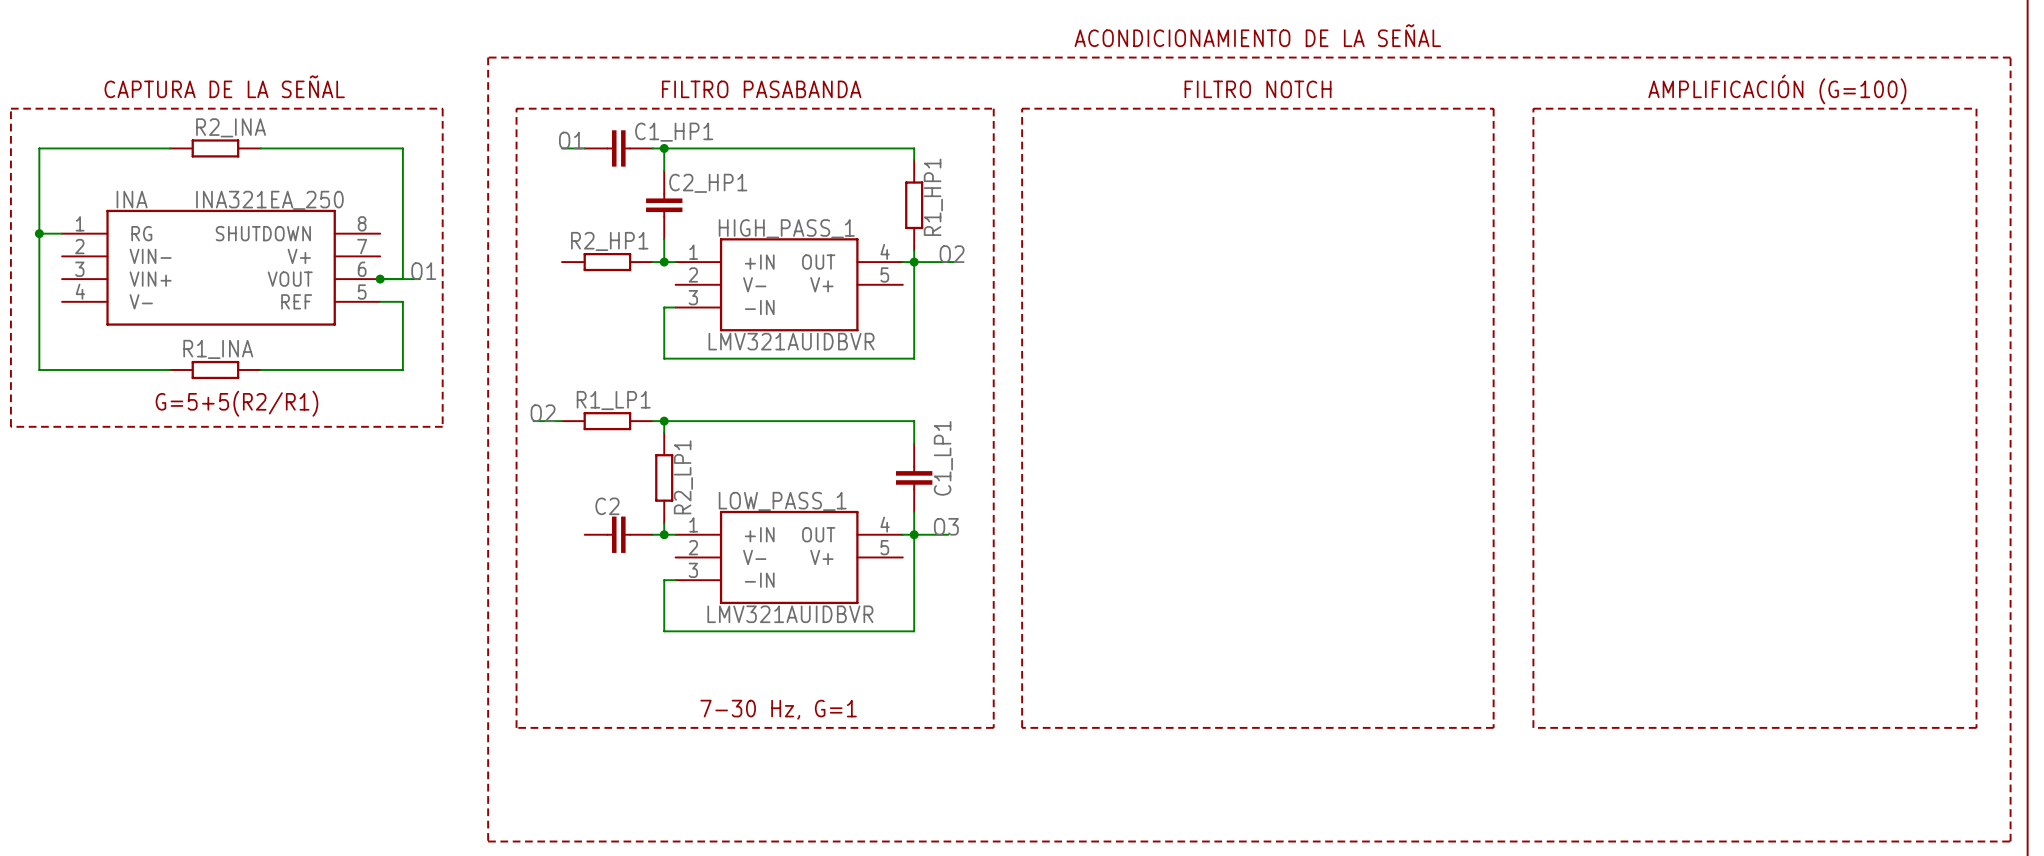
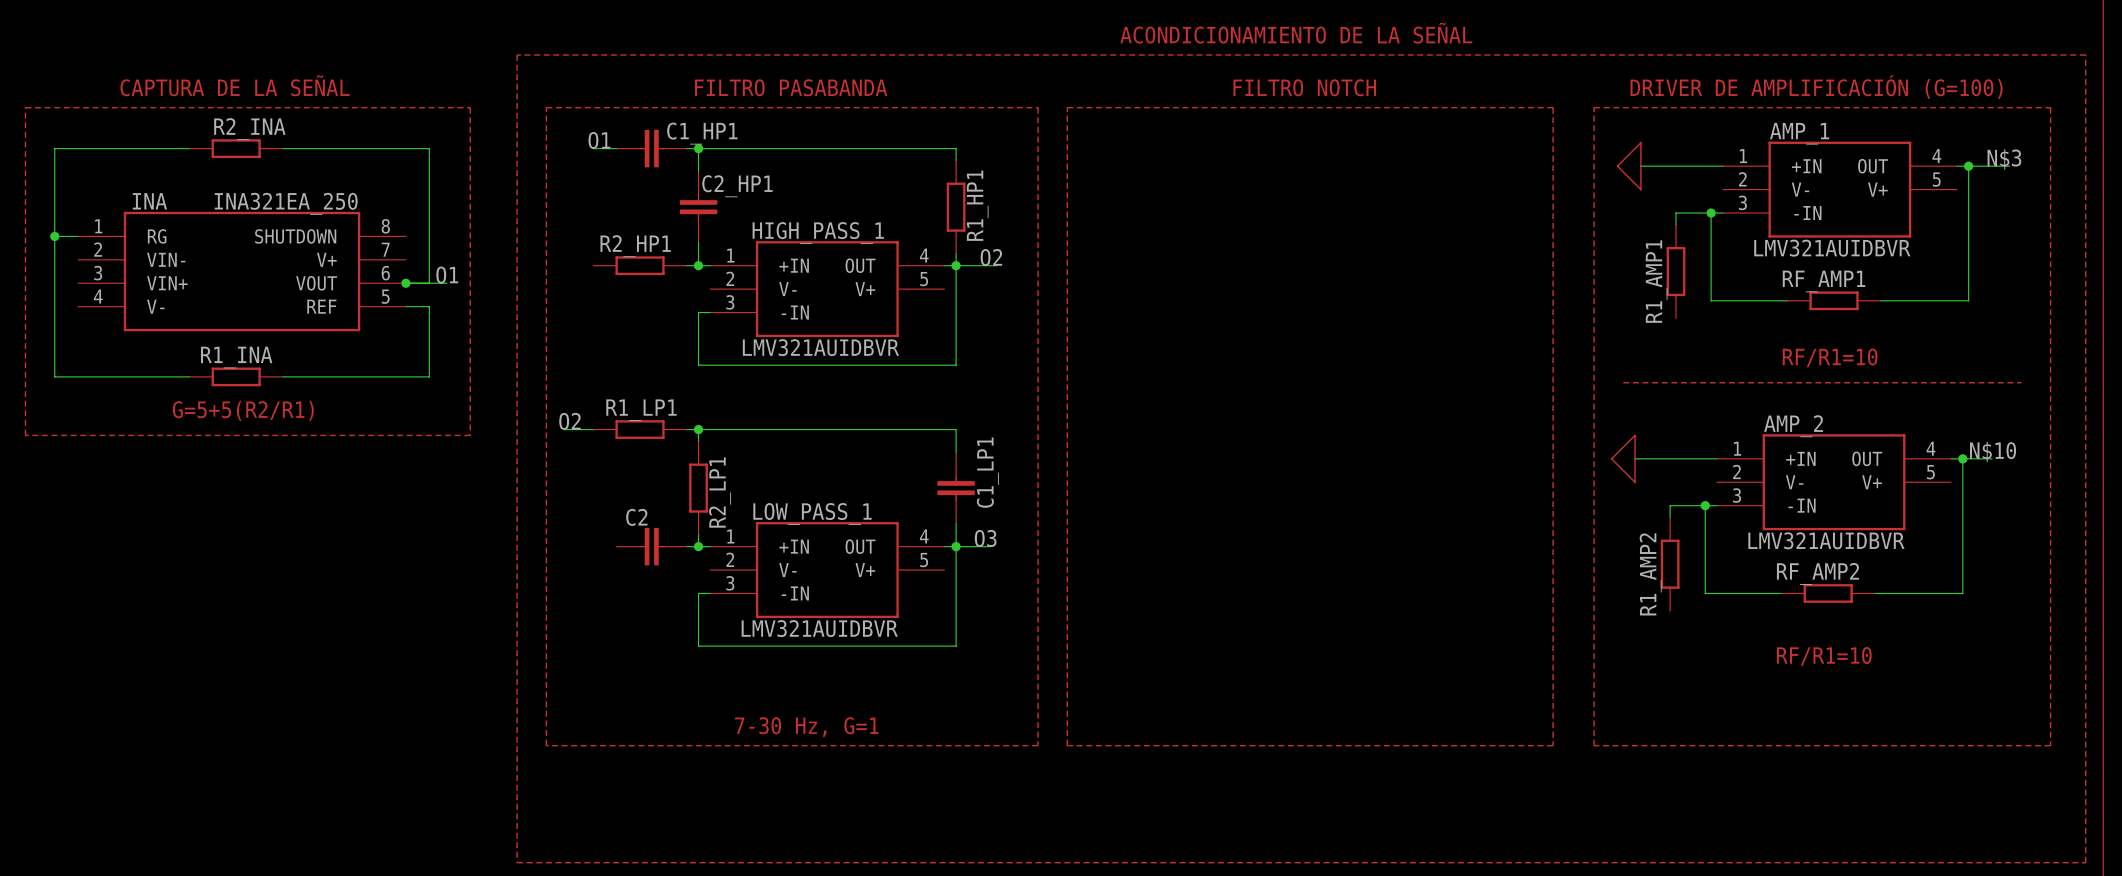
text: AMPLIFICACIÓN (G=100) (1777, 89) -> DRIVER DE AMPLIFICACIÓN (G=100) (1816, 87)
label: none -> N$3 (2004, 159)
power symbol: none -> (1629, 166)
wire: none -> (1640, 166) (1722, 166)
wire: none -> (1956, 166) (2009, 166)
wire: none -> (1968, 166) (1968, 300) (1880, 300)
junction: none -> (1968, 166)
AMP_1: none -> LMV321AUIDBVR (1839, 189)
wire: none -> (1711, 213) (1711, 300) (1787, 300)
junction: none -> (1711, 213)
wire: none -> (1722, 213) (1676, 213) (1676, 224)
R1_AMP1: none -> (1676, 271)
RF_AMP1: none -> (1834, 300)
text: none -> RF/R1=10 (1830, 357)
line: none -> (1623, 382) (2021, 382)
label: none -> N$10 (1993, 451)
power symbol: none -> (1623, 458)
wire: none -> (1635, 458) (1716, 458)
wire: none -> (1951, 458) (1992, 458)
wire: none -> (1962, 458) (1962, 593) (1875, 593)
junction: none -> (1962, 458)
AMP_2: none -> LMV321AUIDBVR (1834, 482)
wire: none -> (1705, 505) (1705, 593) (1781, 593)
junction: none -> (1705, 505)
wire: none -> (1716, 505) (1670, 505) (1670, 517)
R1_AMP2: none -> (1670, 564)
RF_AMP2: none -> (1828, 593)
text: none -> RF/R1=10 (1824, 656)

